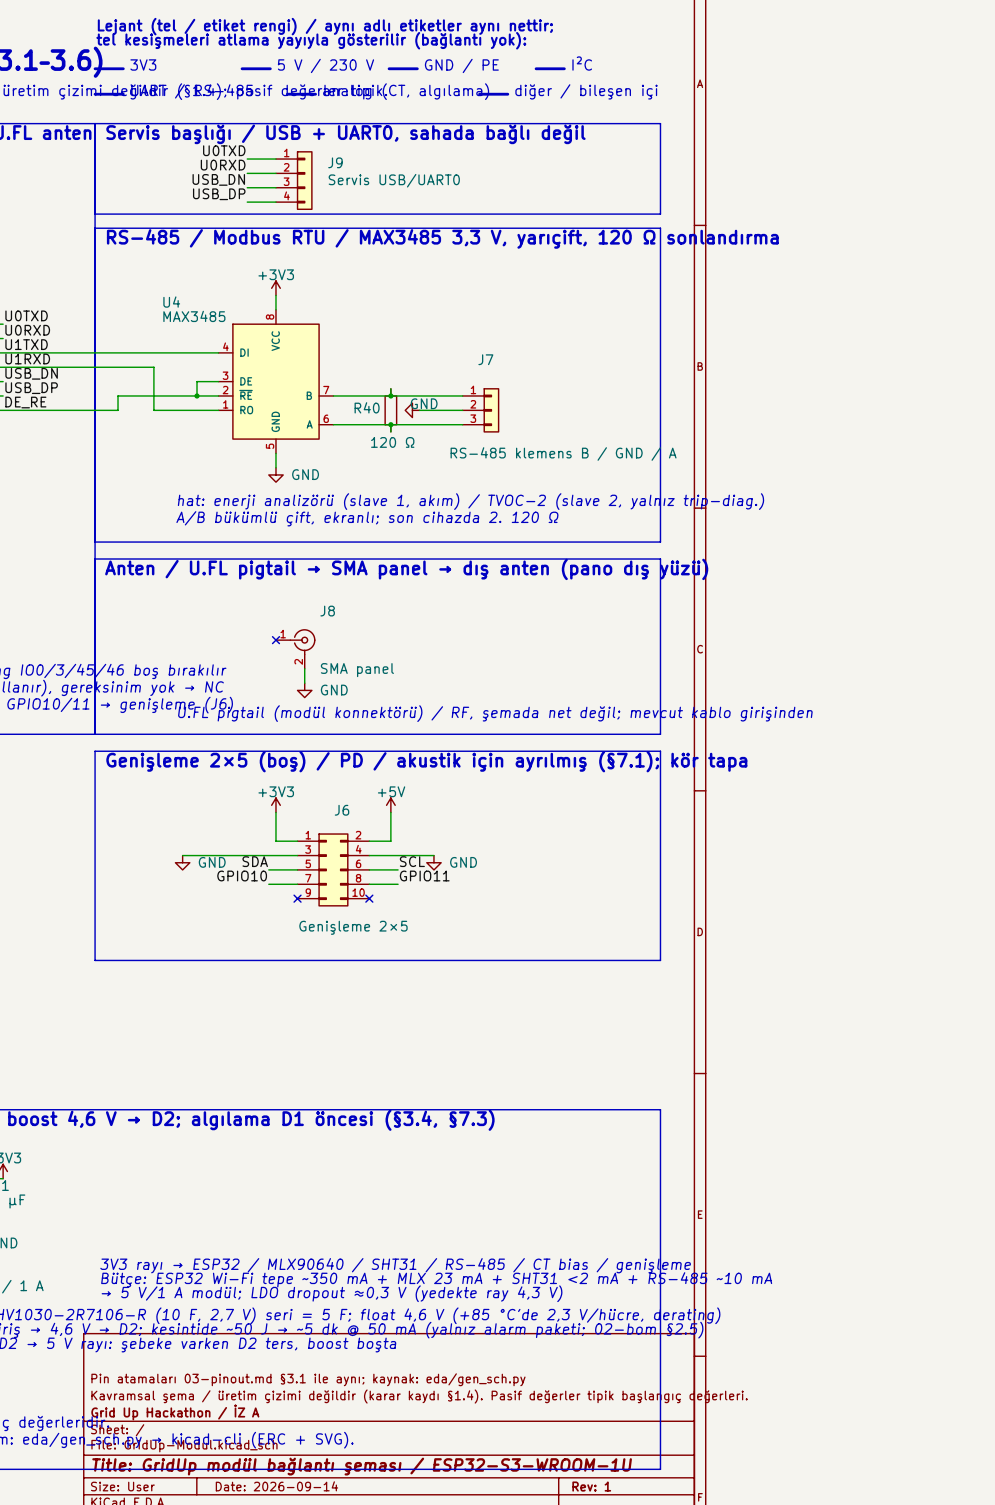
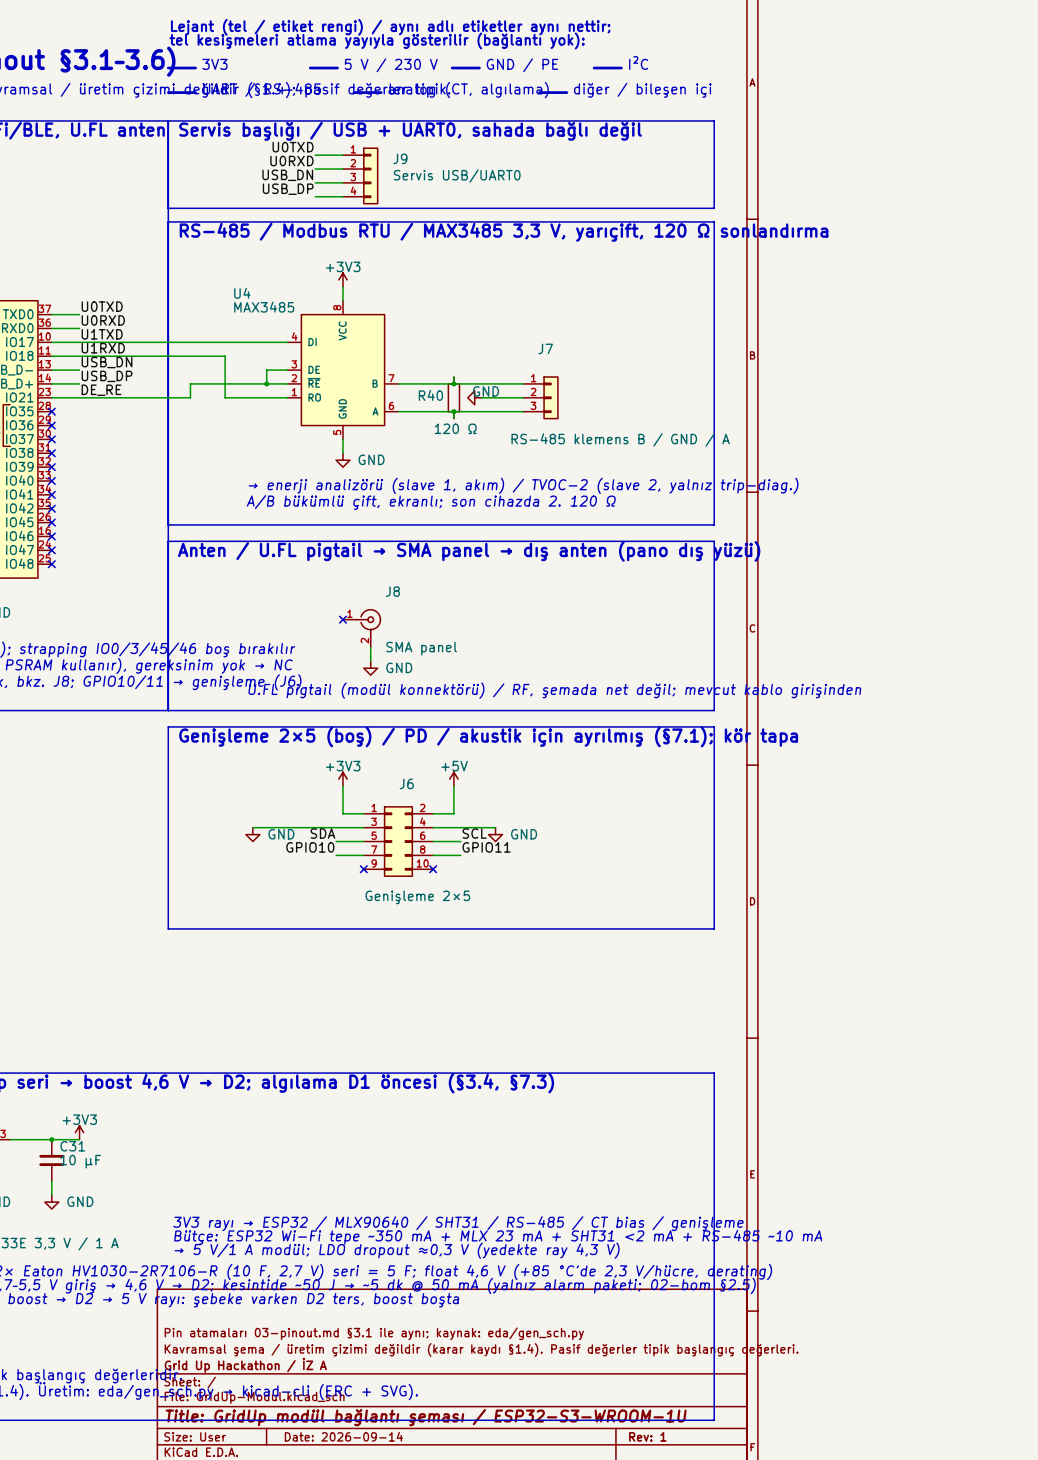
text: hat: enerji analizörü (slave 1, akım) / TVOC-2 (slave 2, yalnız trip-diag.) (470, 501) -> → enerji analizörü (slave 1, akım) / TVOC-2 (slave 2, yalnız trip-diag.) (523, 485)

